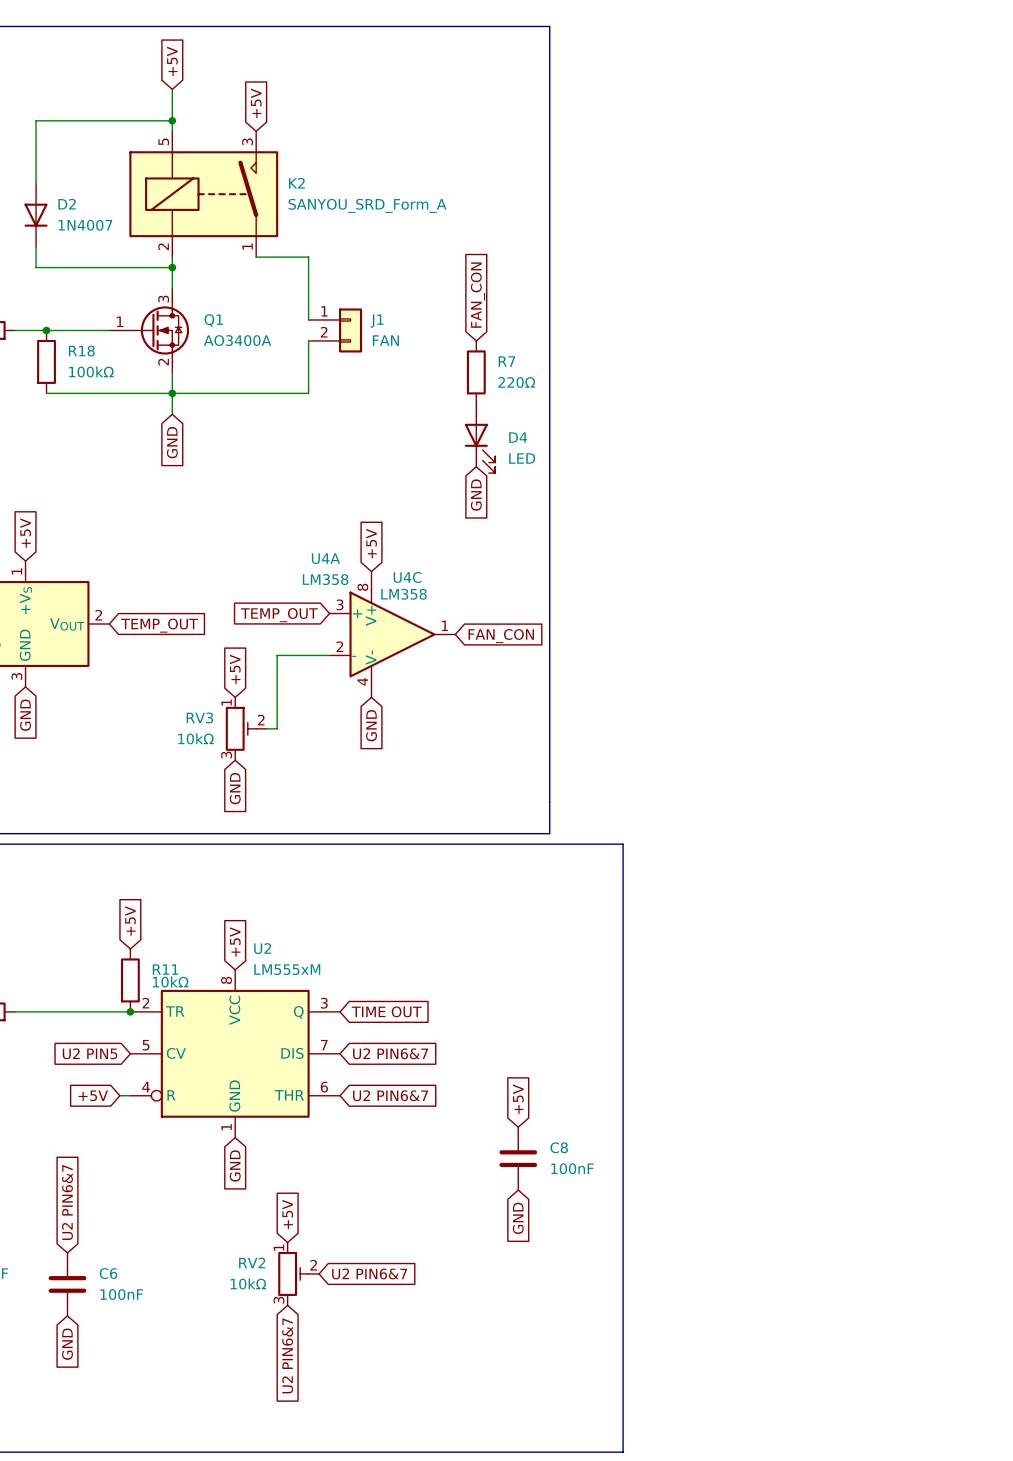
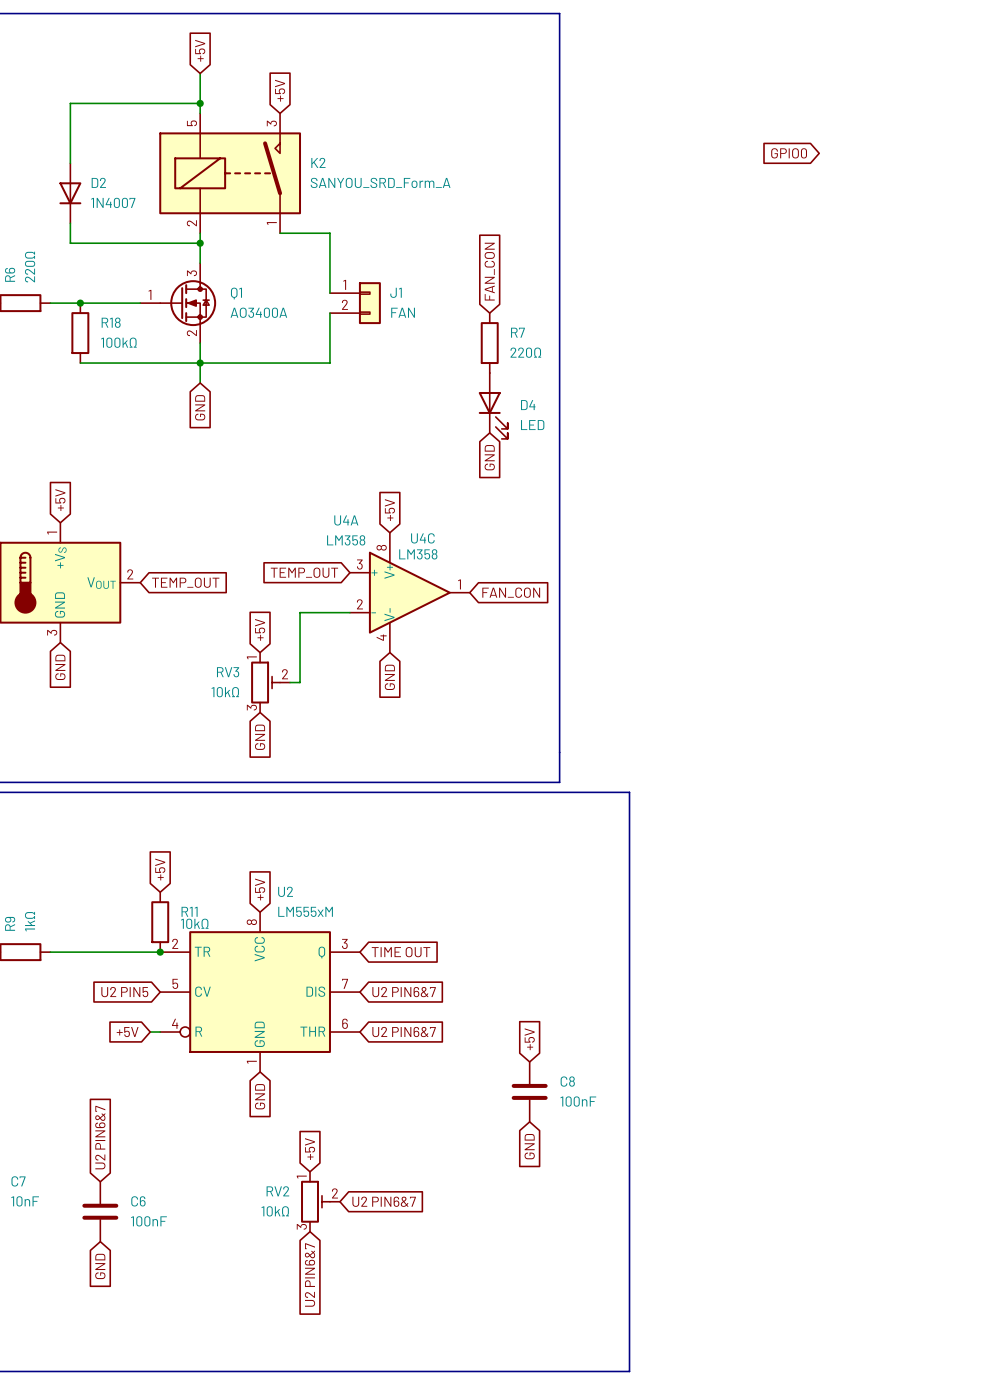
global label: none -> GPIO0 (789, 153)

